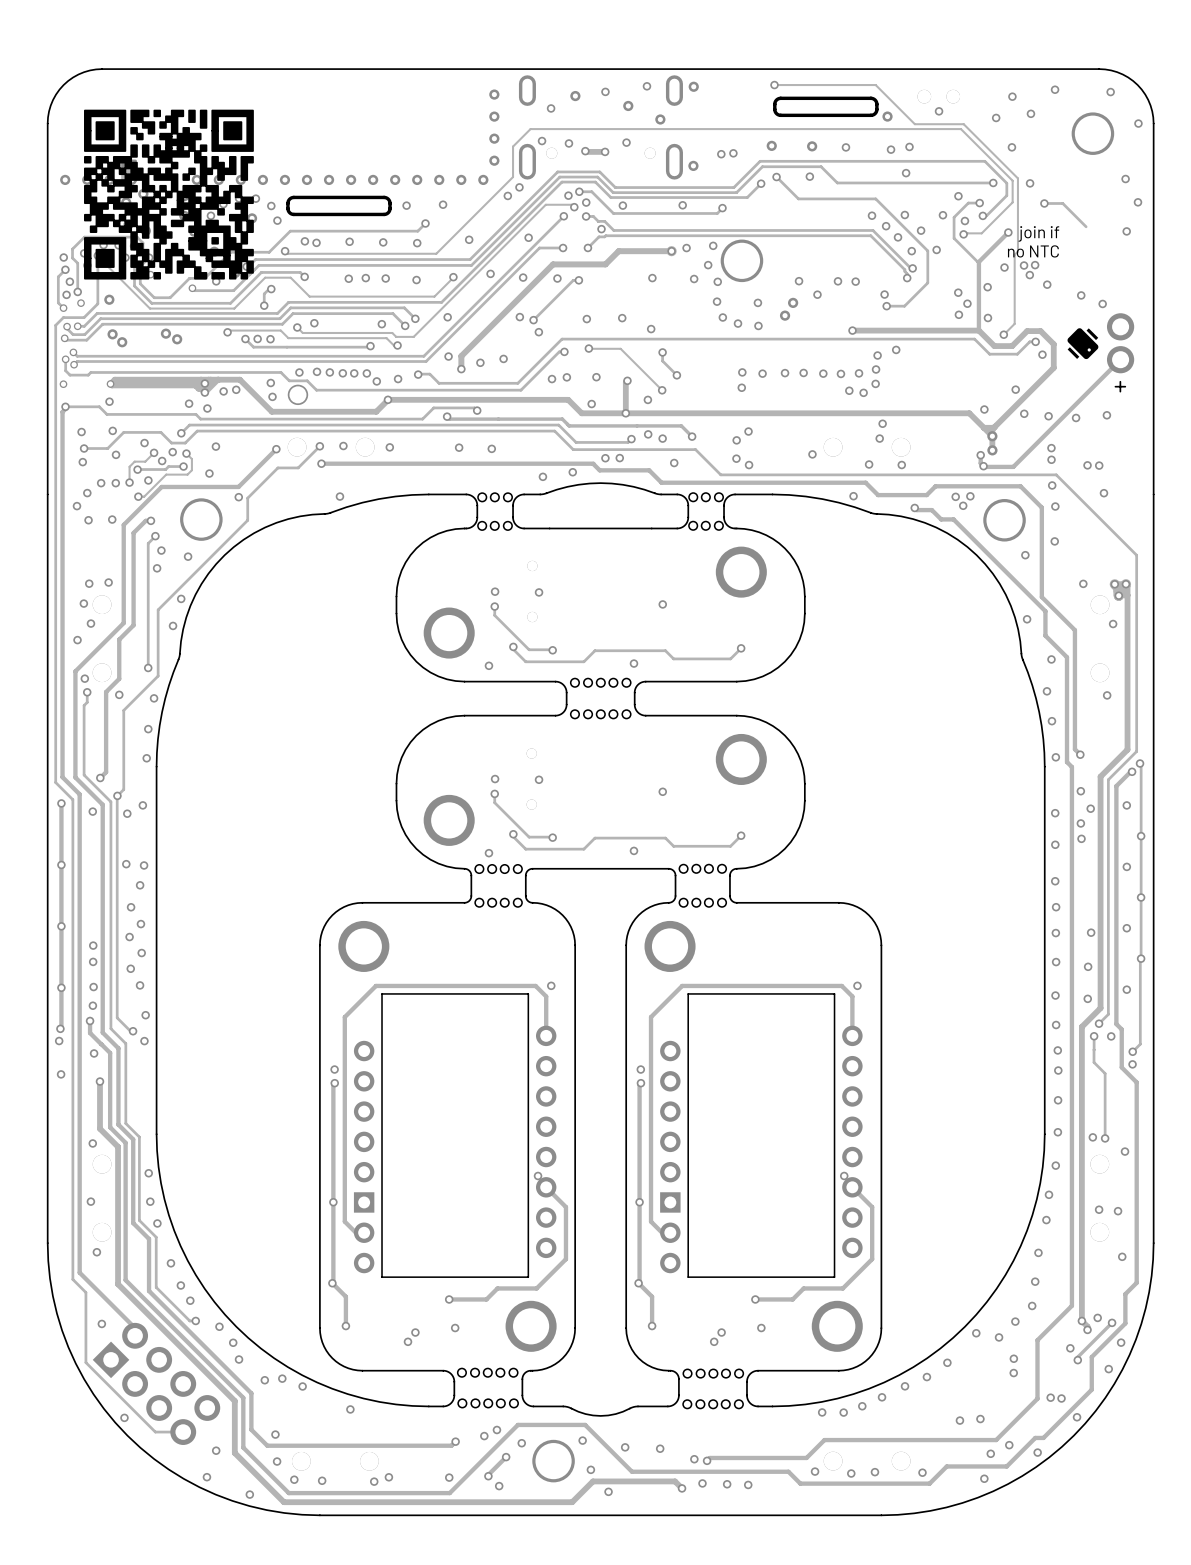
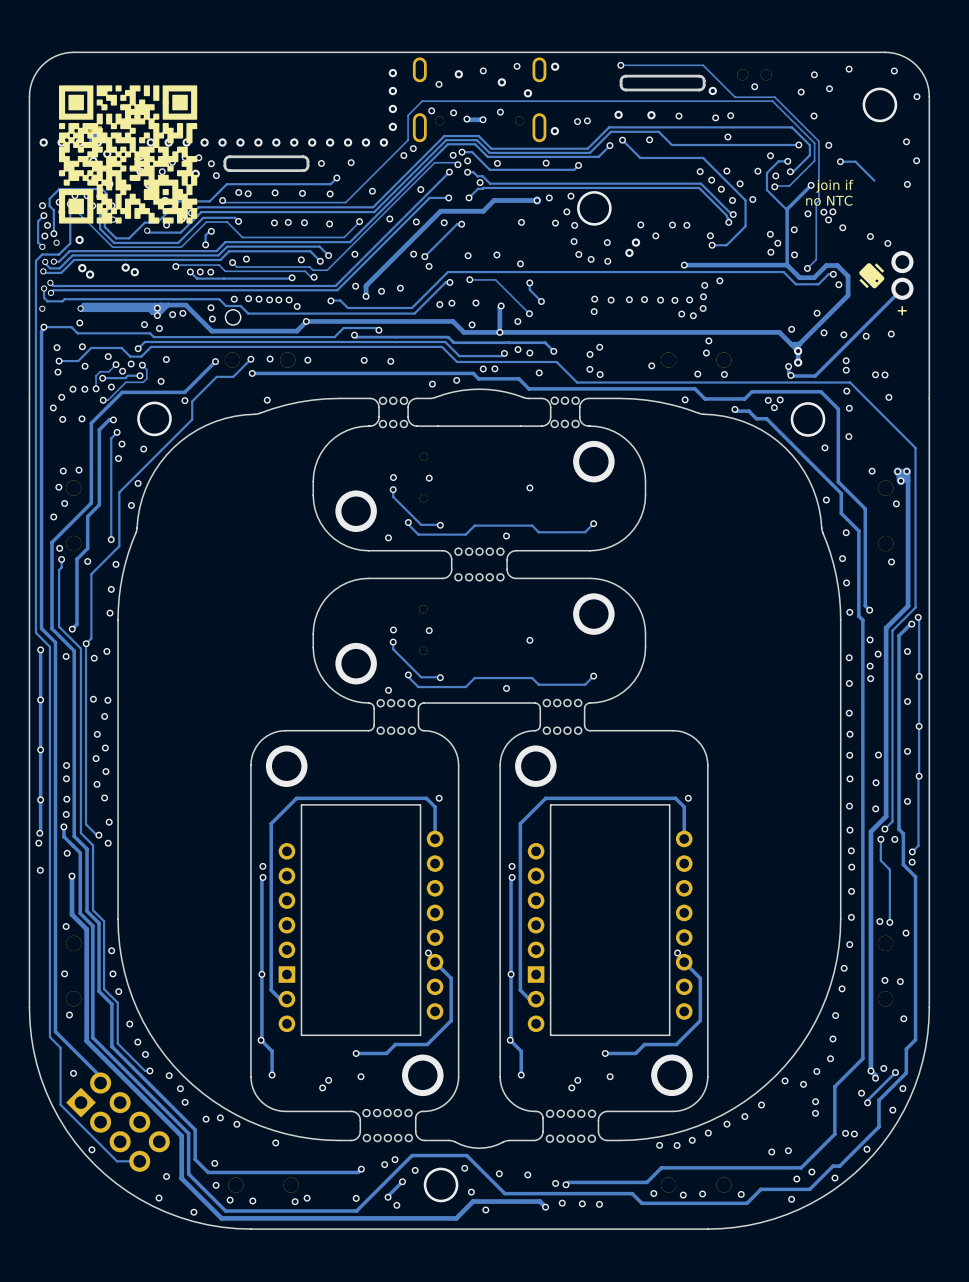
via: (398, 379) -> none

